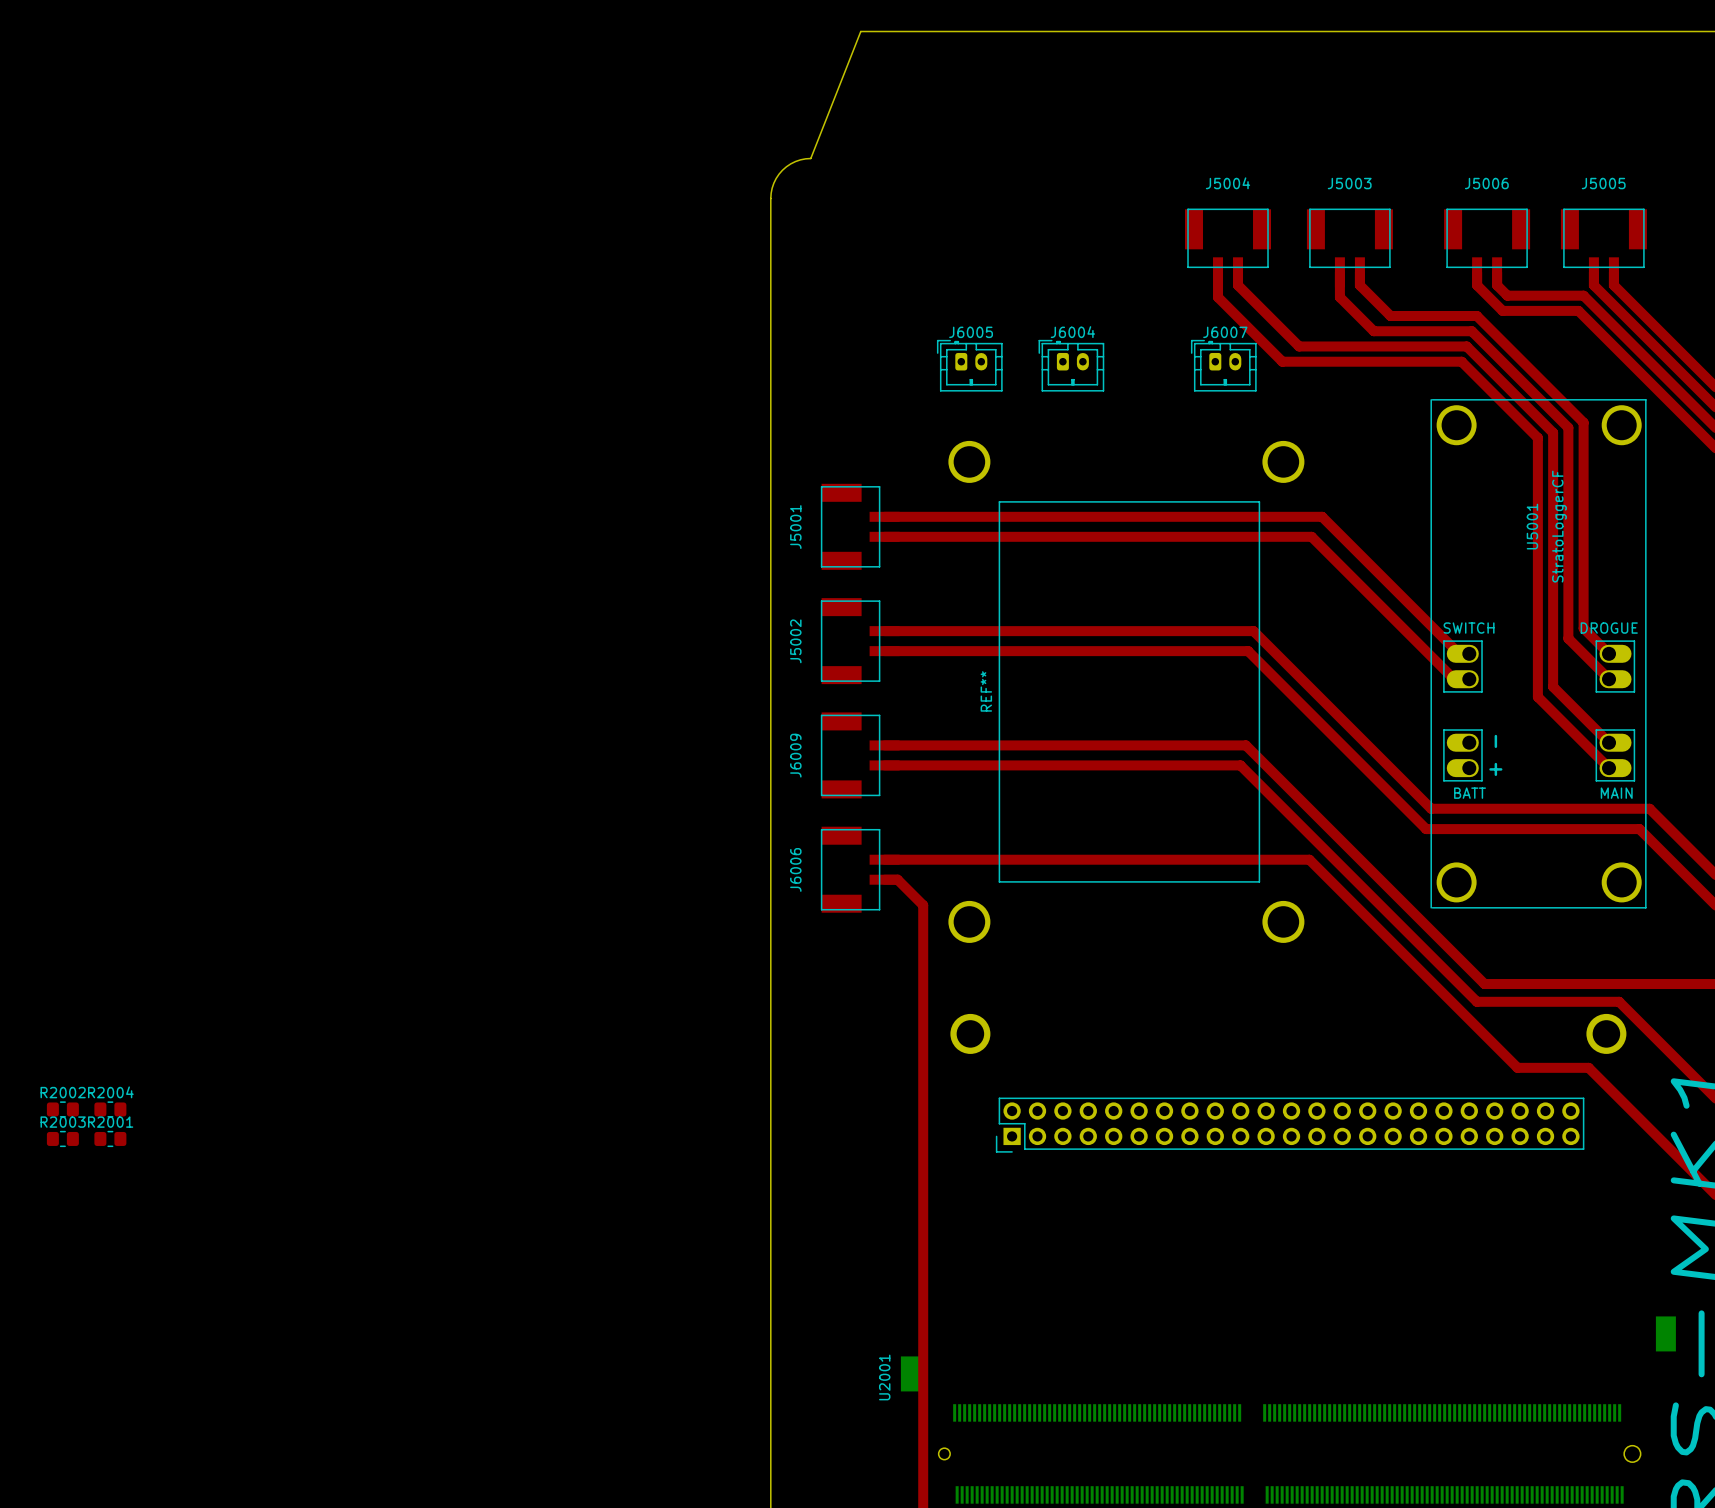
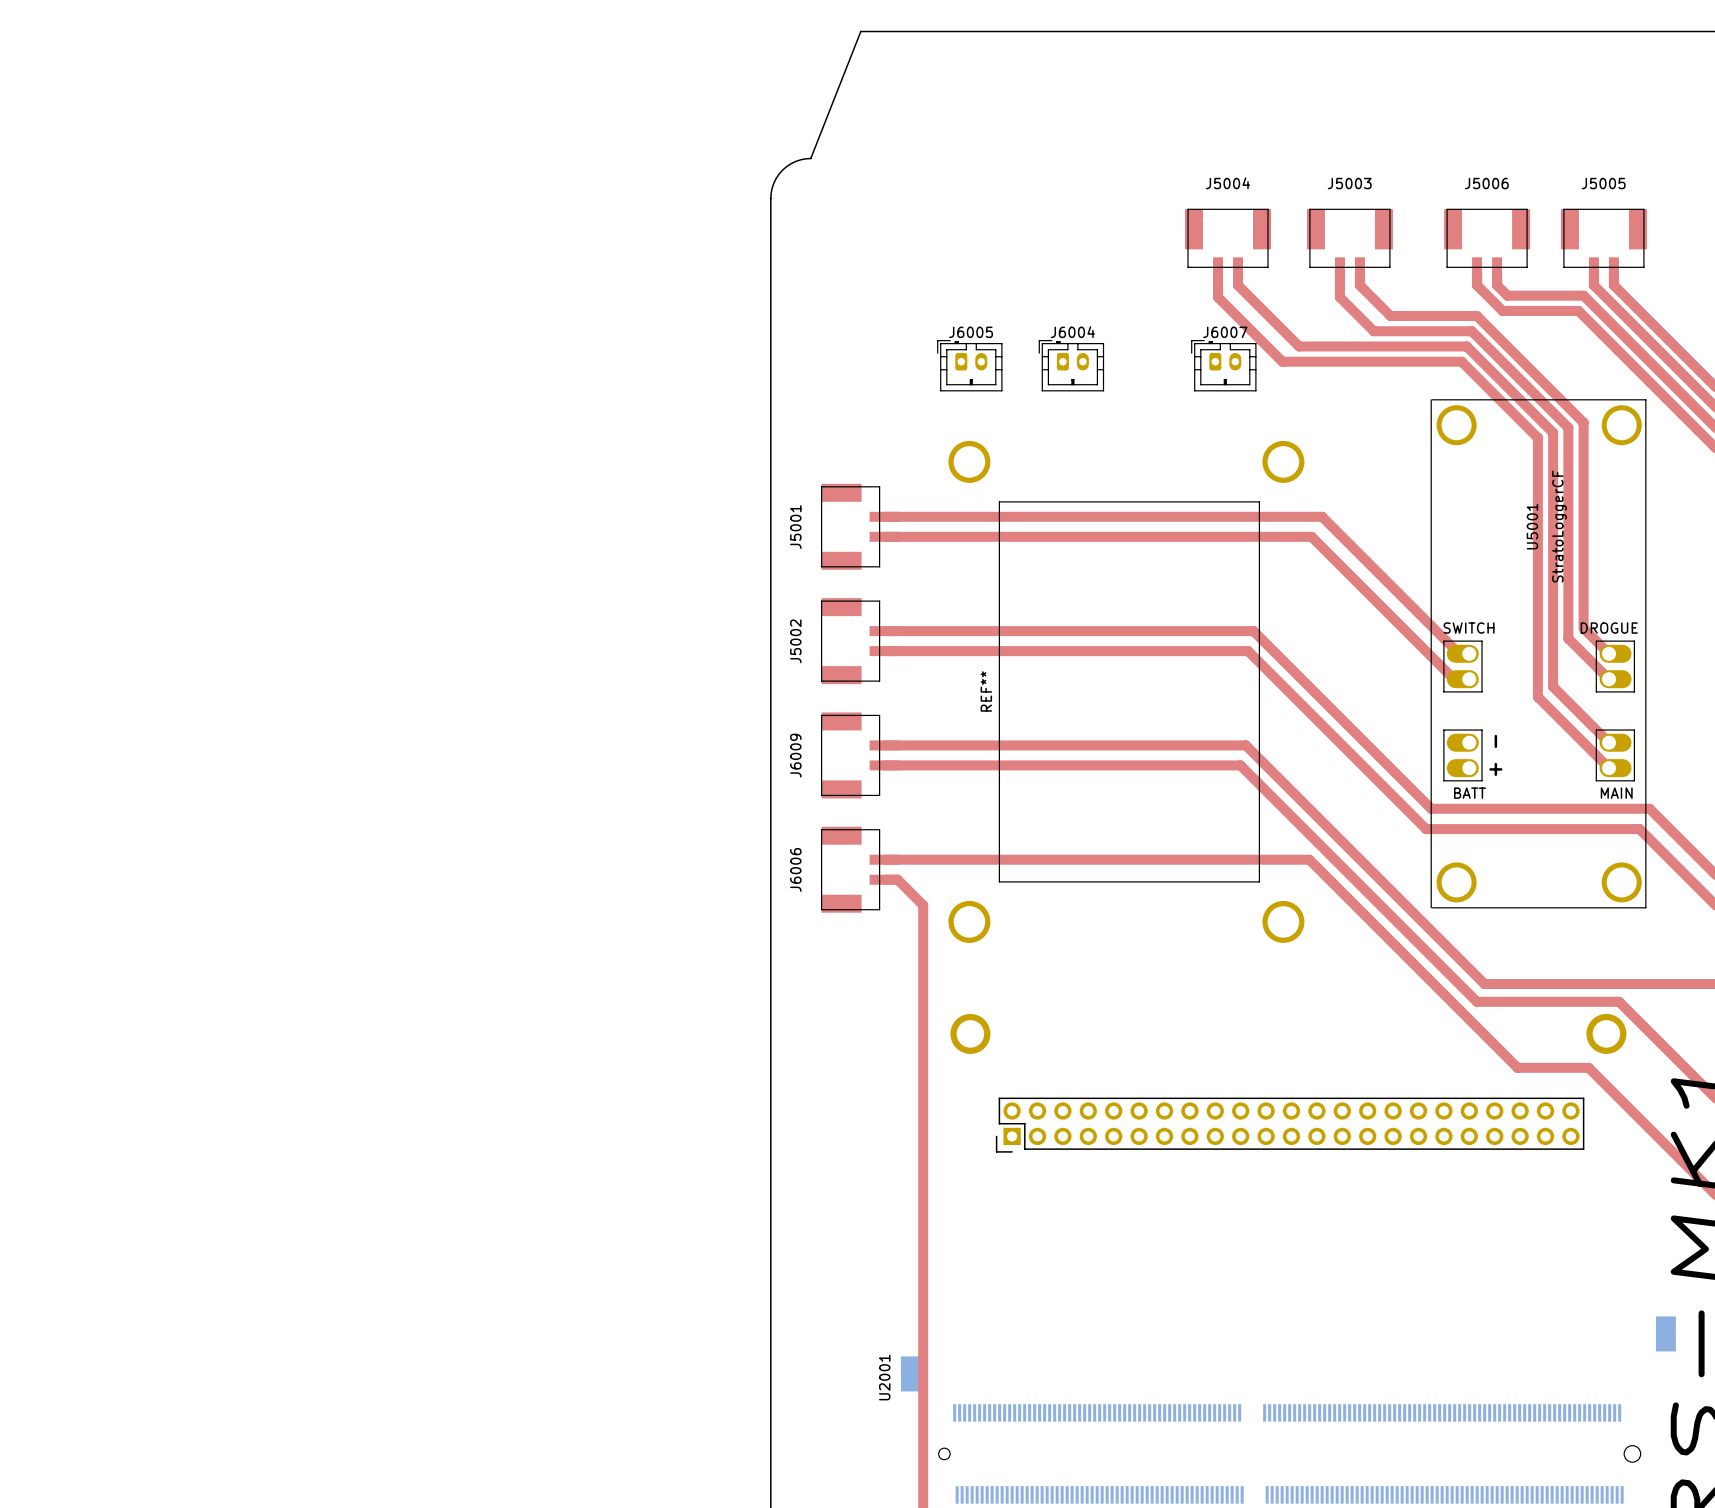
R2002: (62, 1109) -> none
R2004: (110, 1109) -> none
R2003: (62, 1138) -> none
R2001: (110, 1138) -> none

